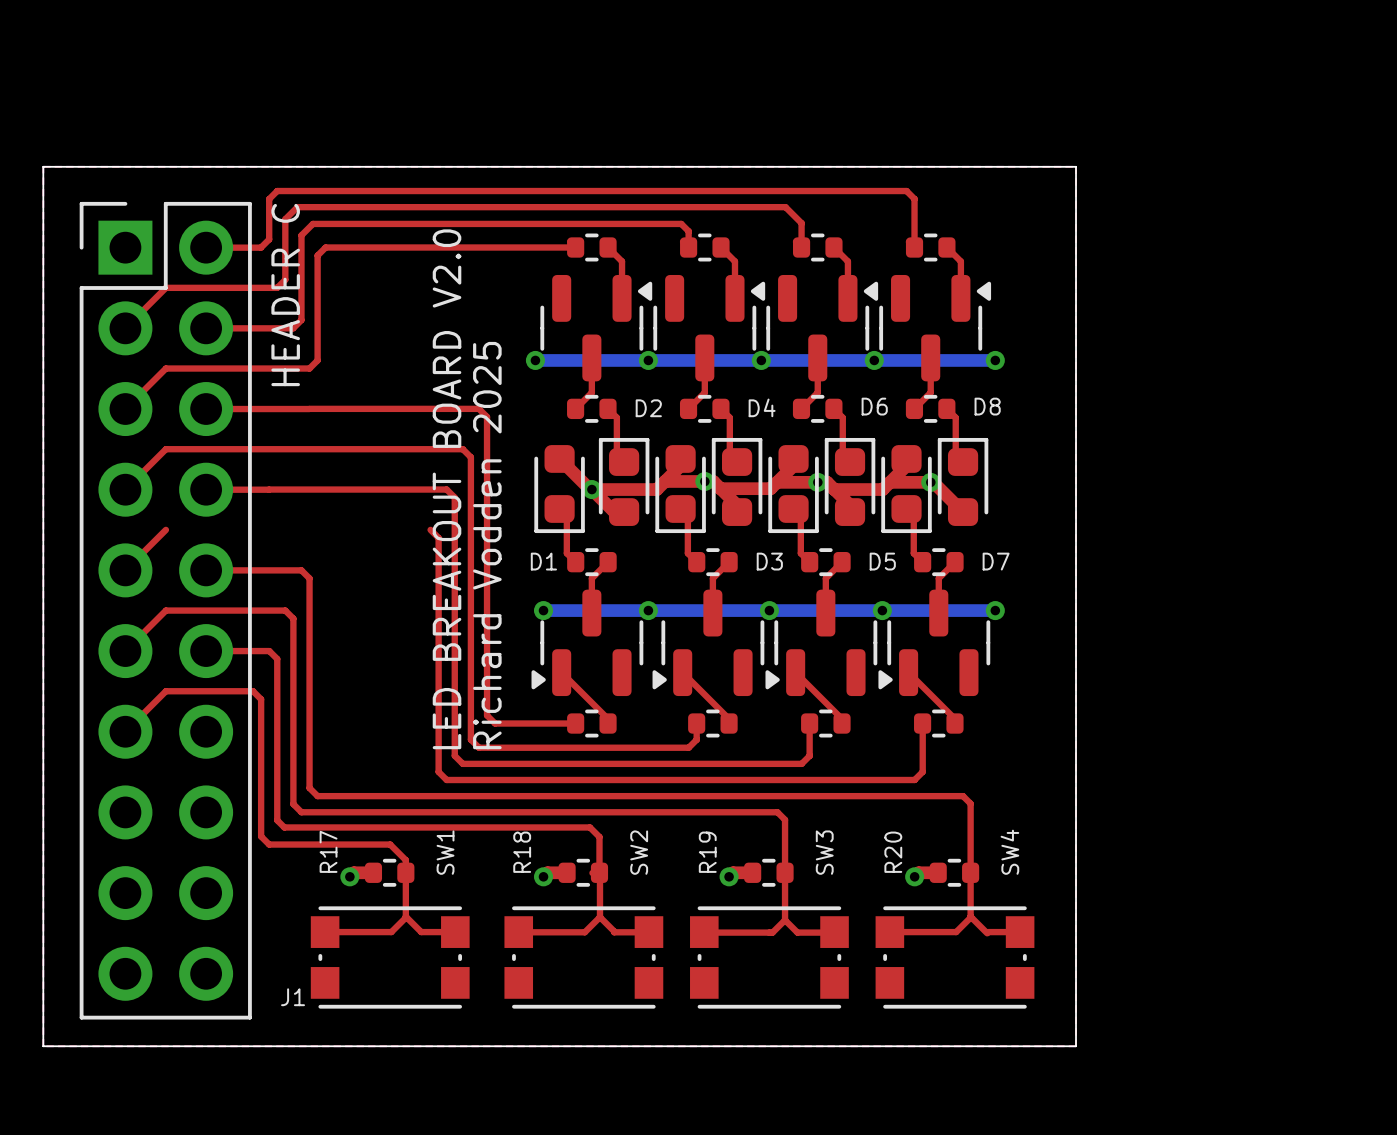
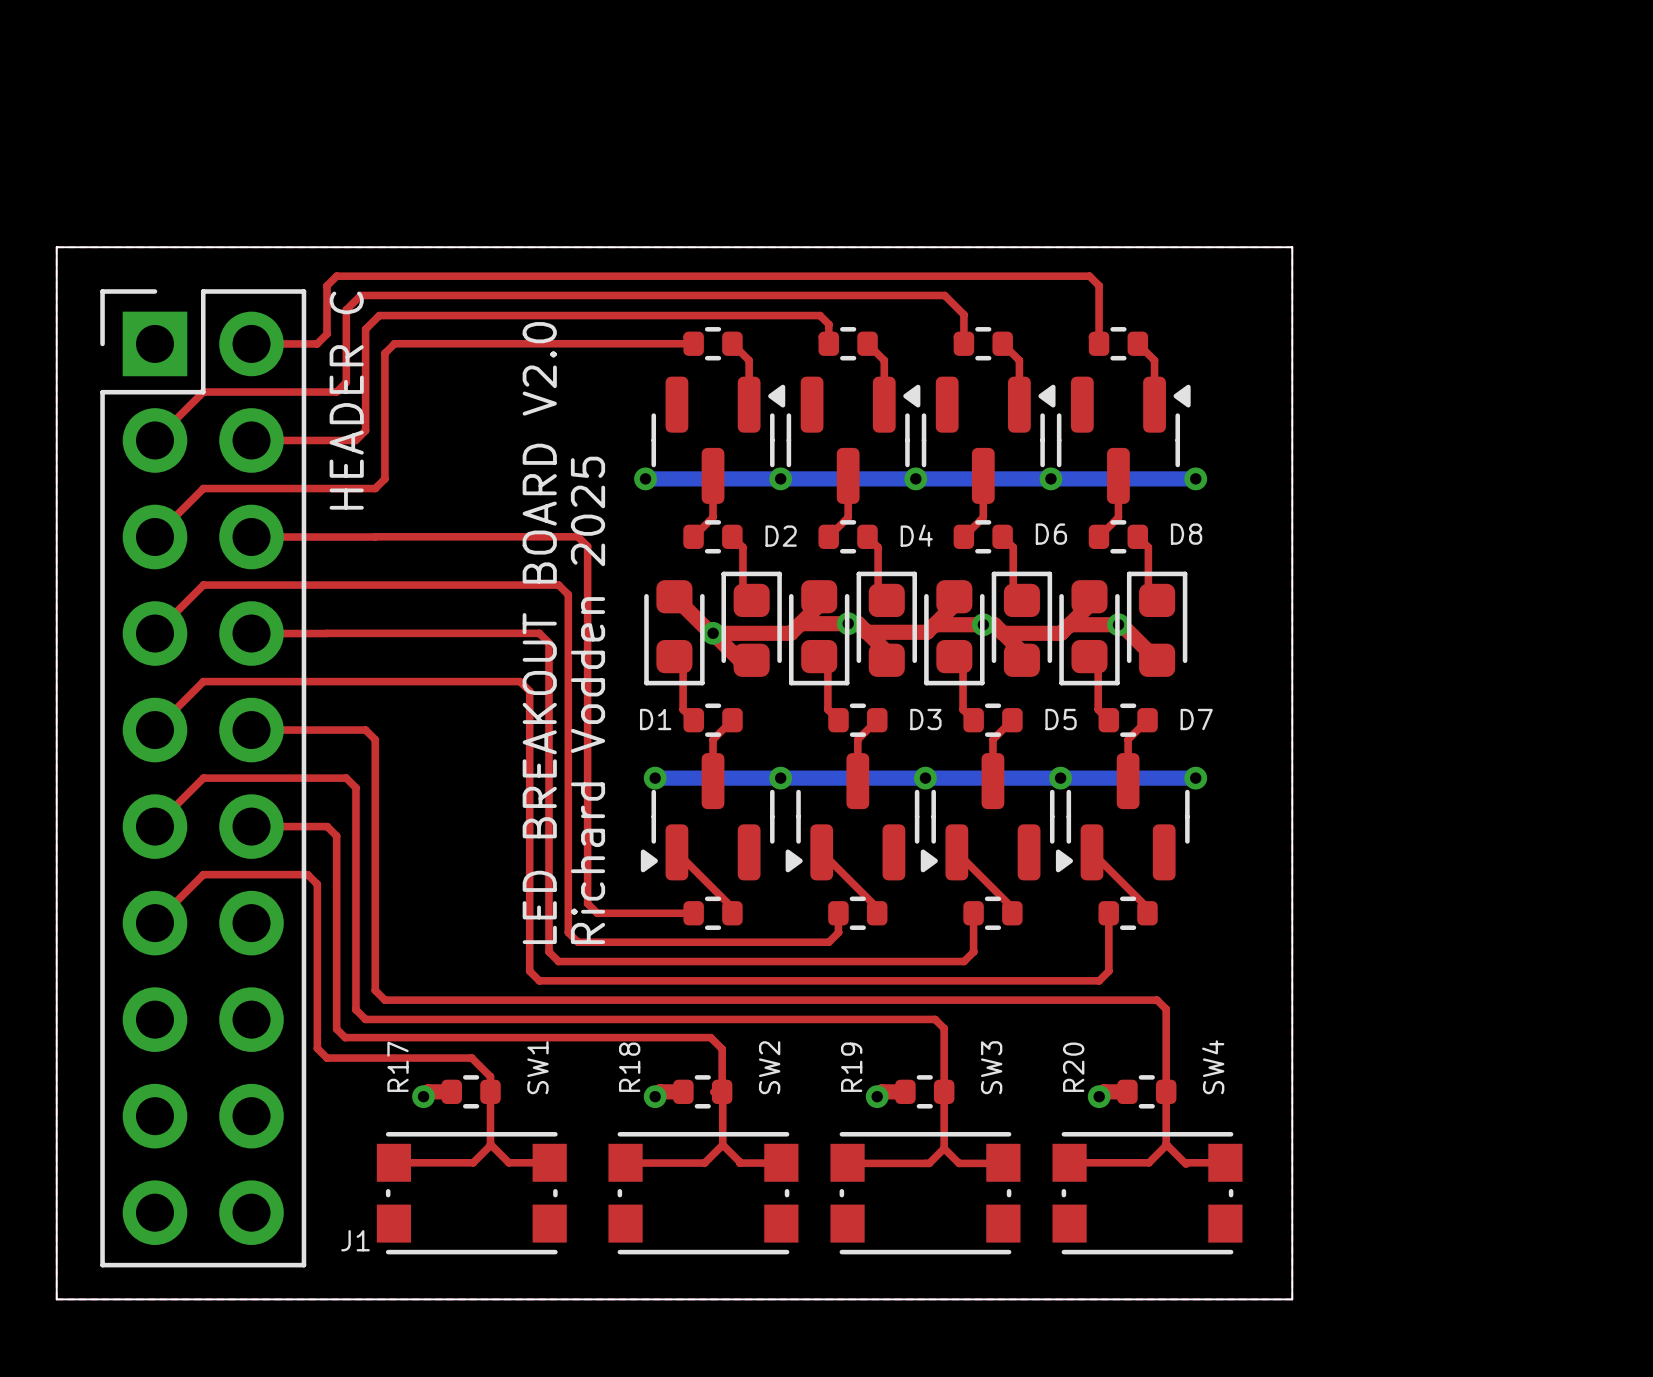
top track: none -> (203, 681) (520, 681)

